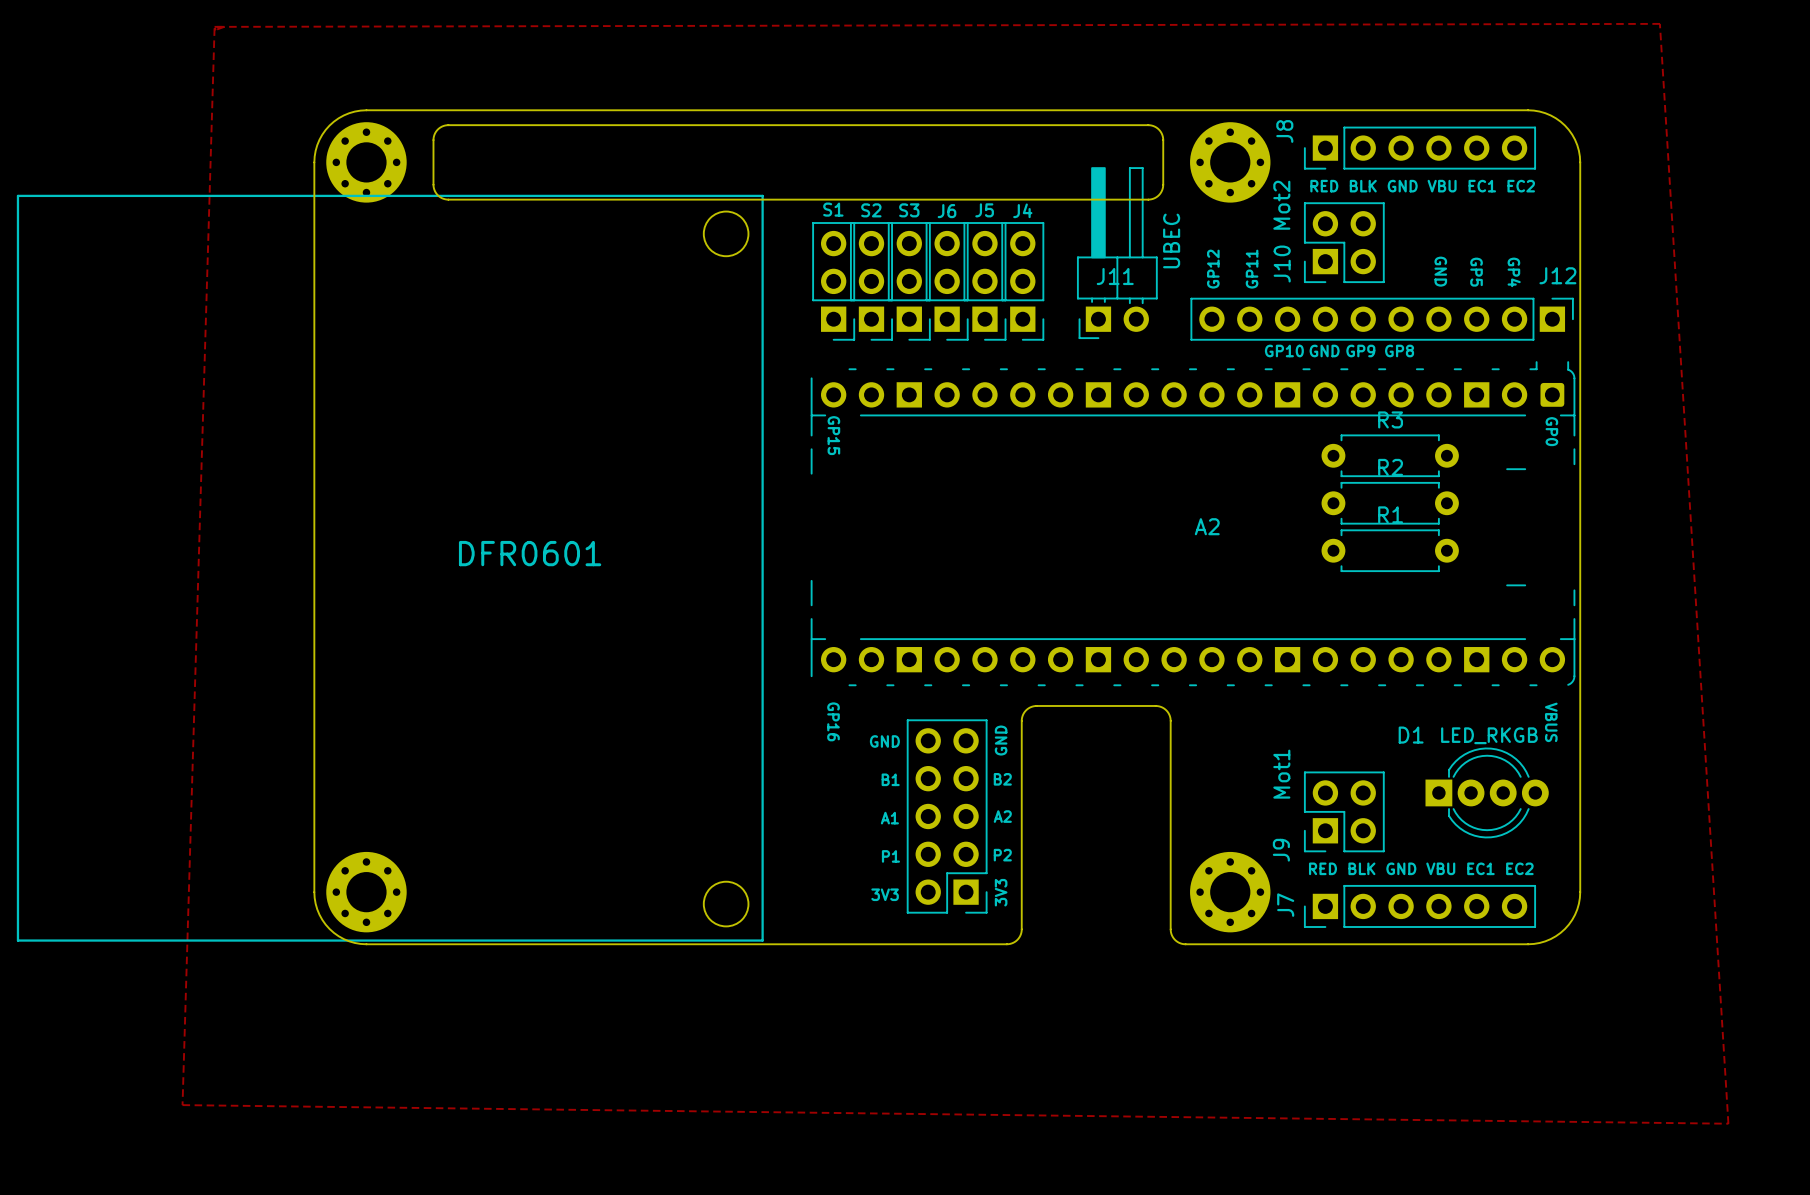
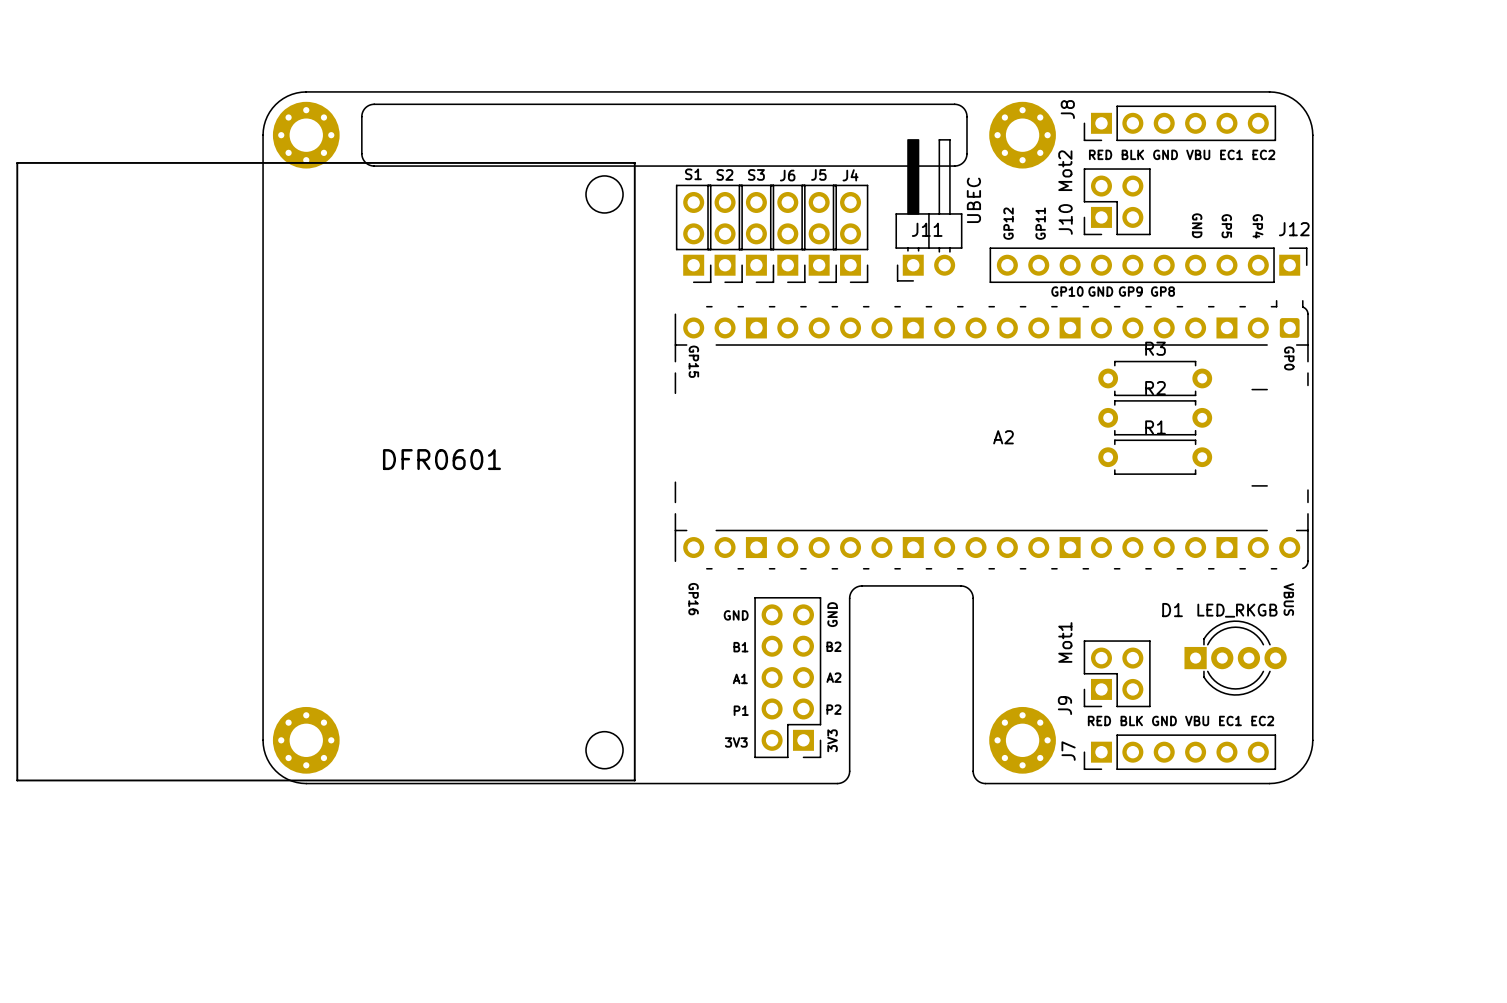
zone outline: (1659, 23) (1728, 1123) (182, 1105) (214, 28) (216, 29) (224, 26) (214, 26) (1659, 23) -> none

